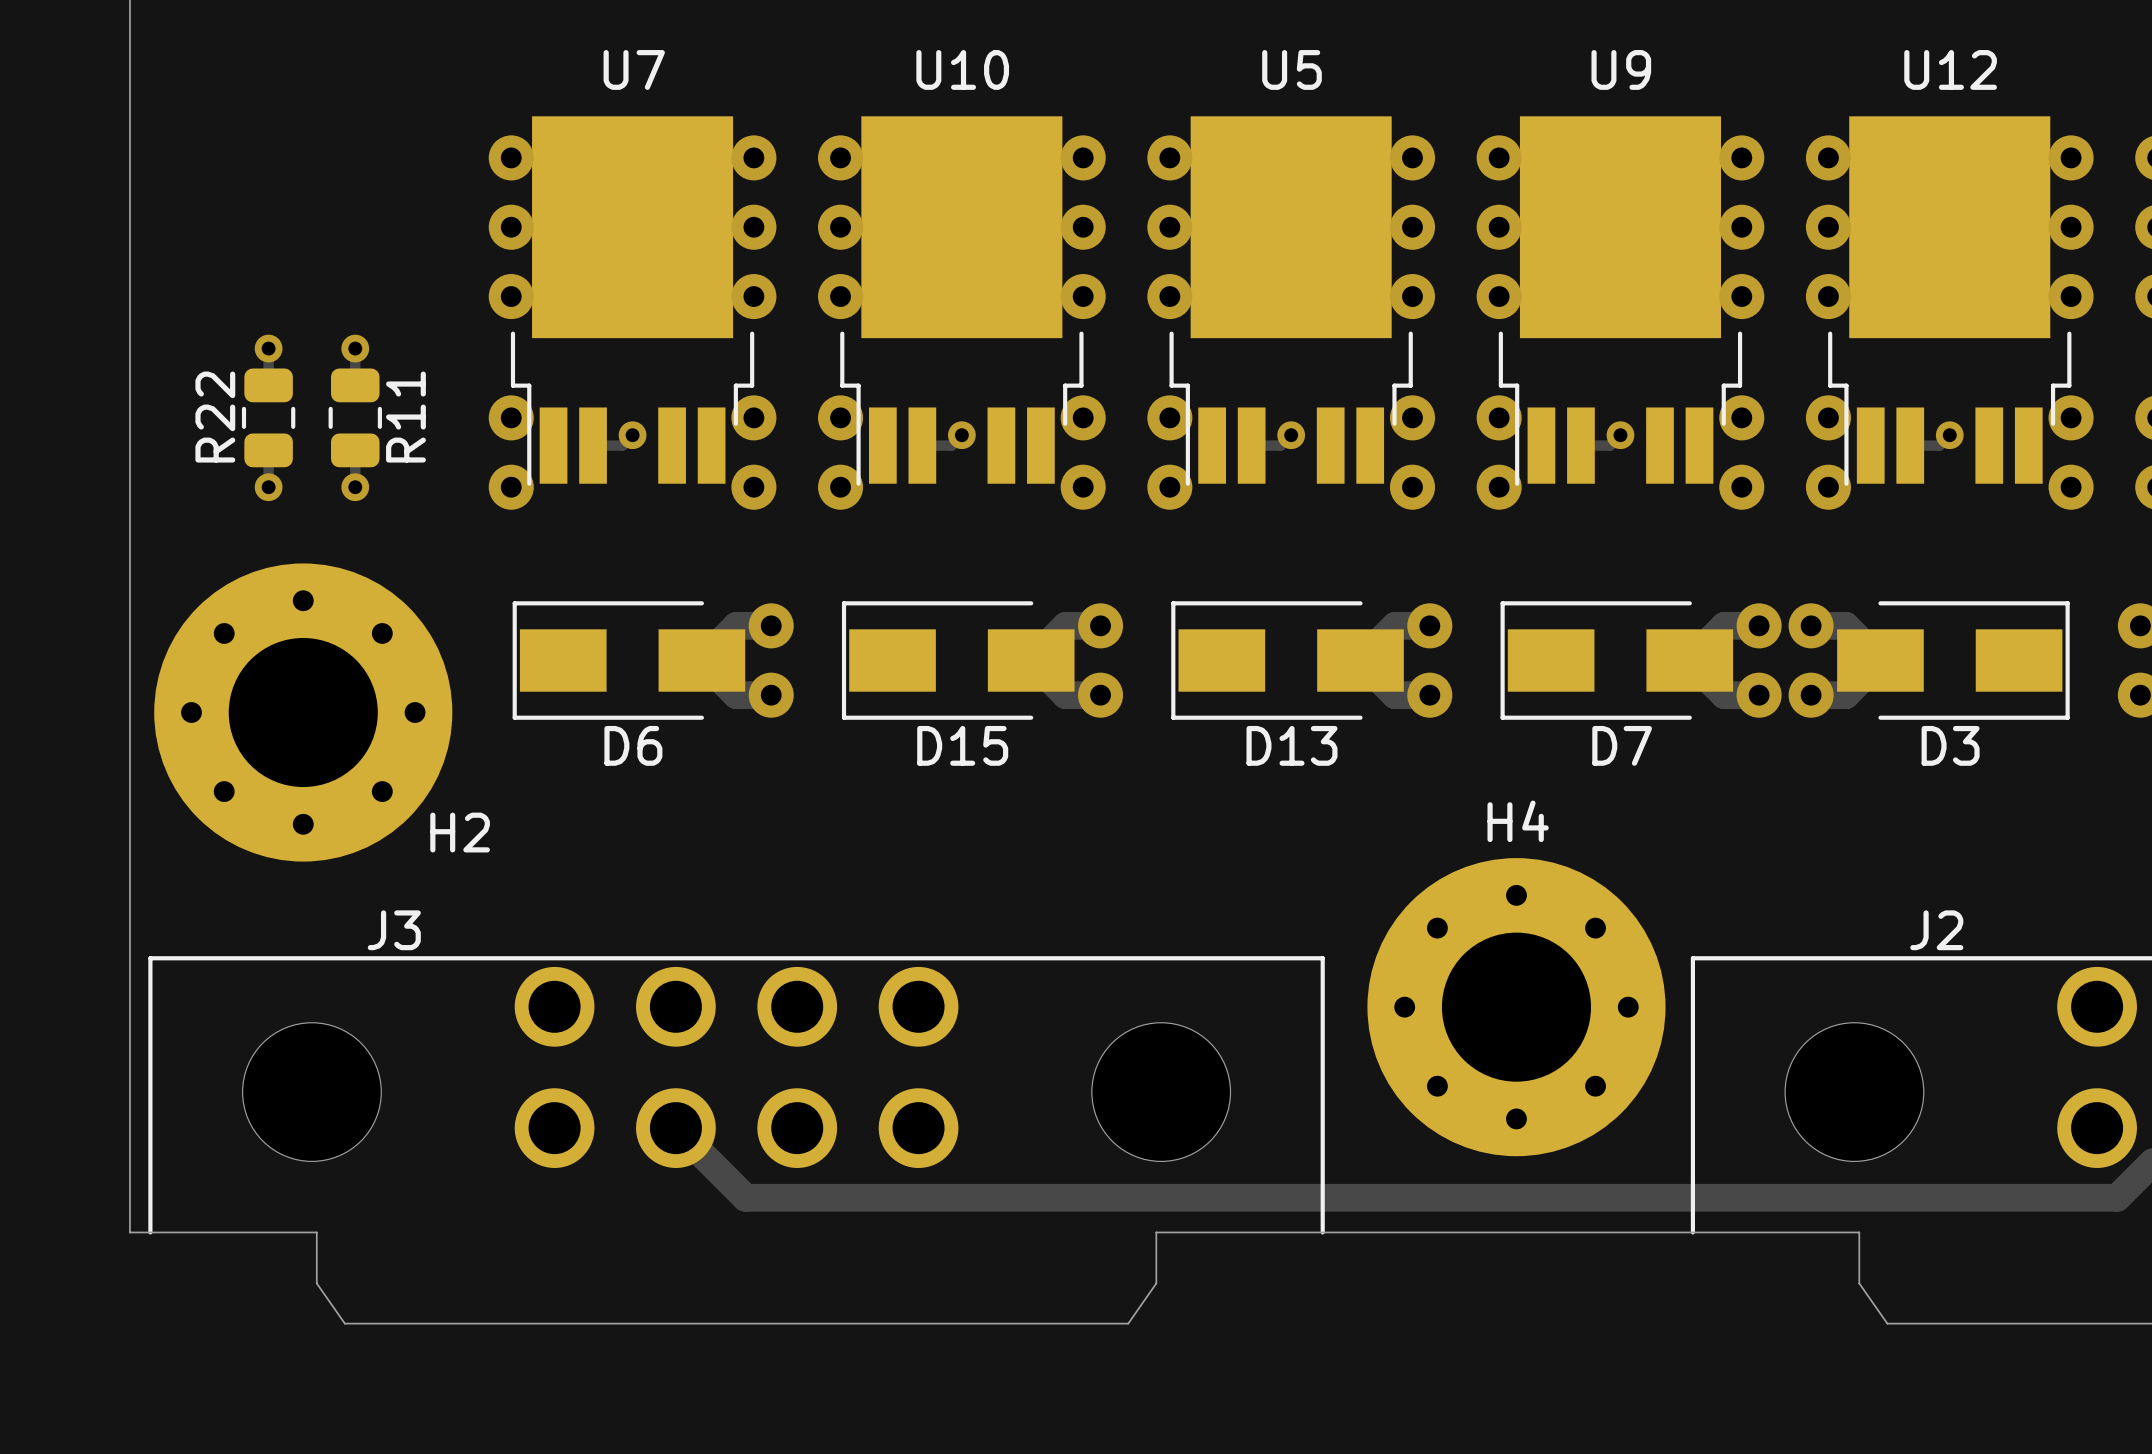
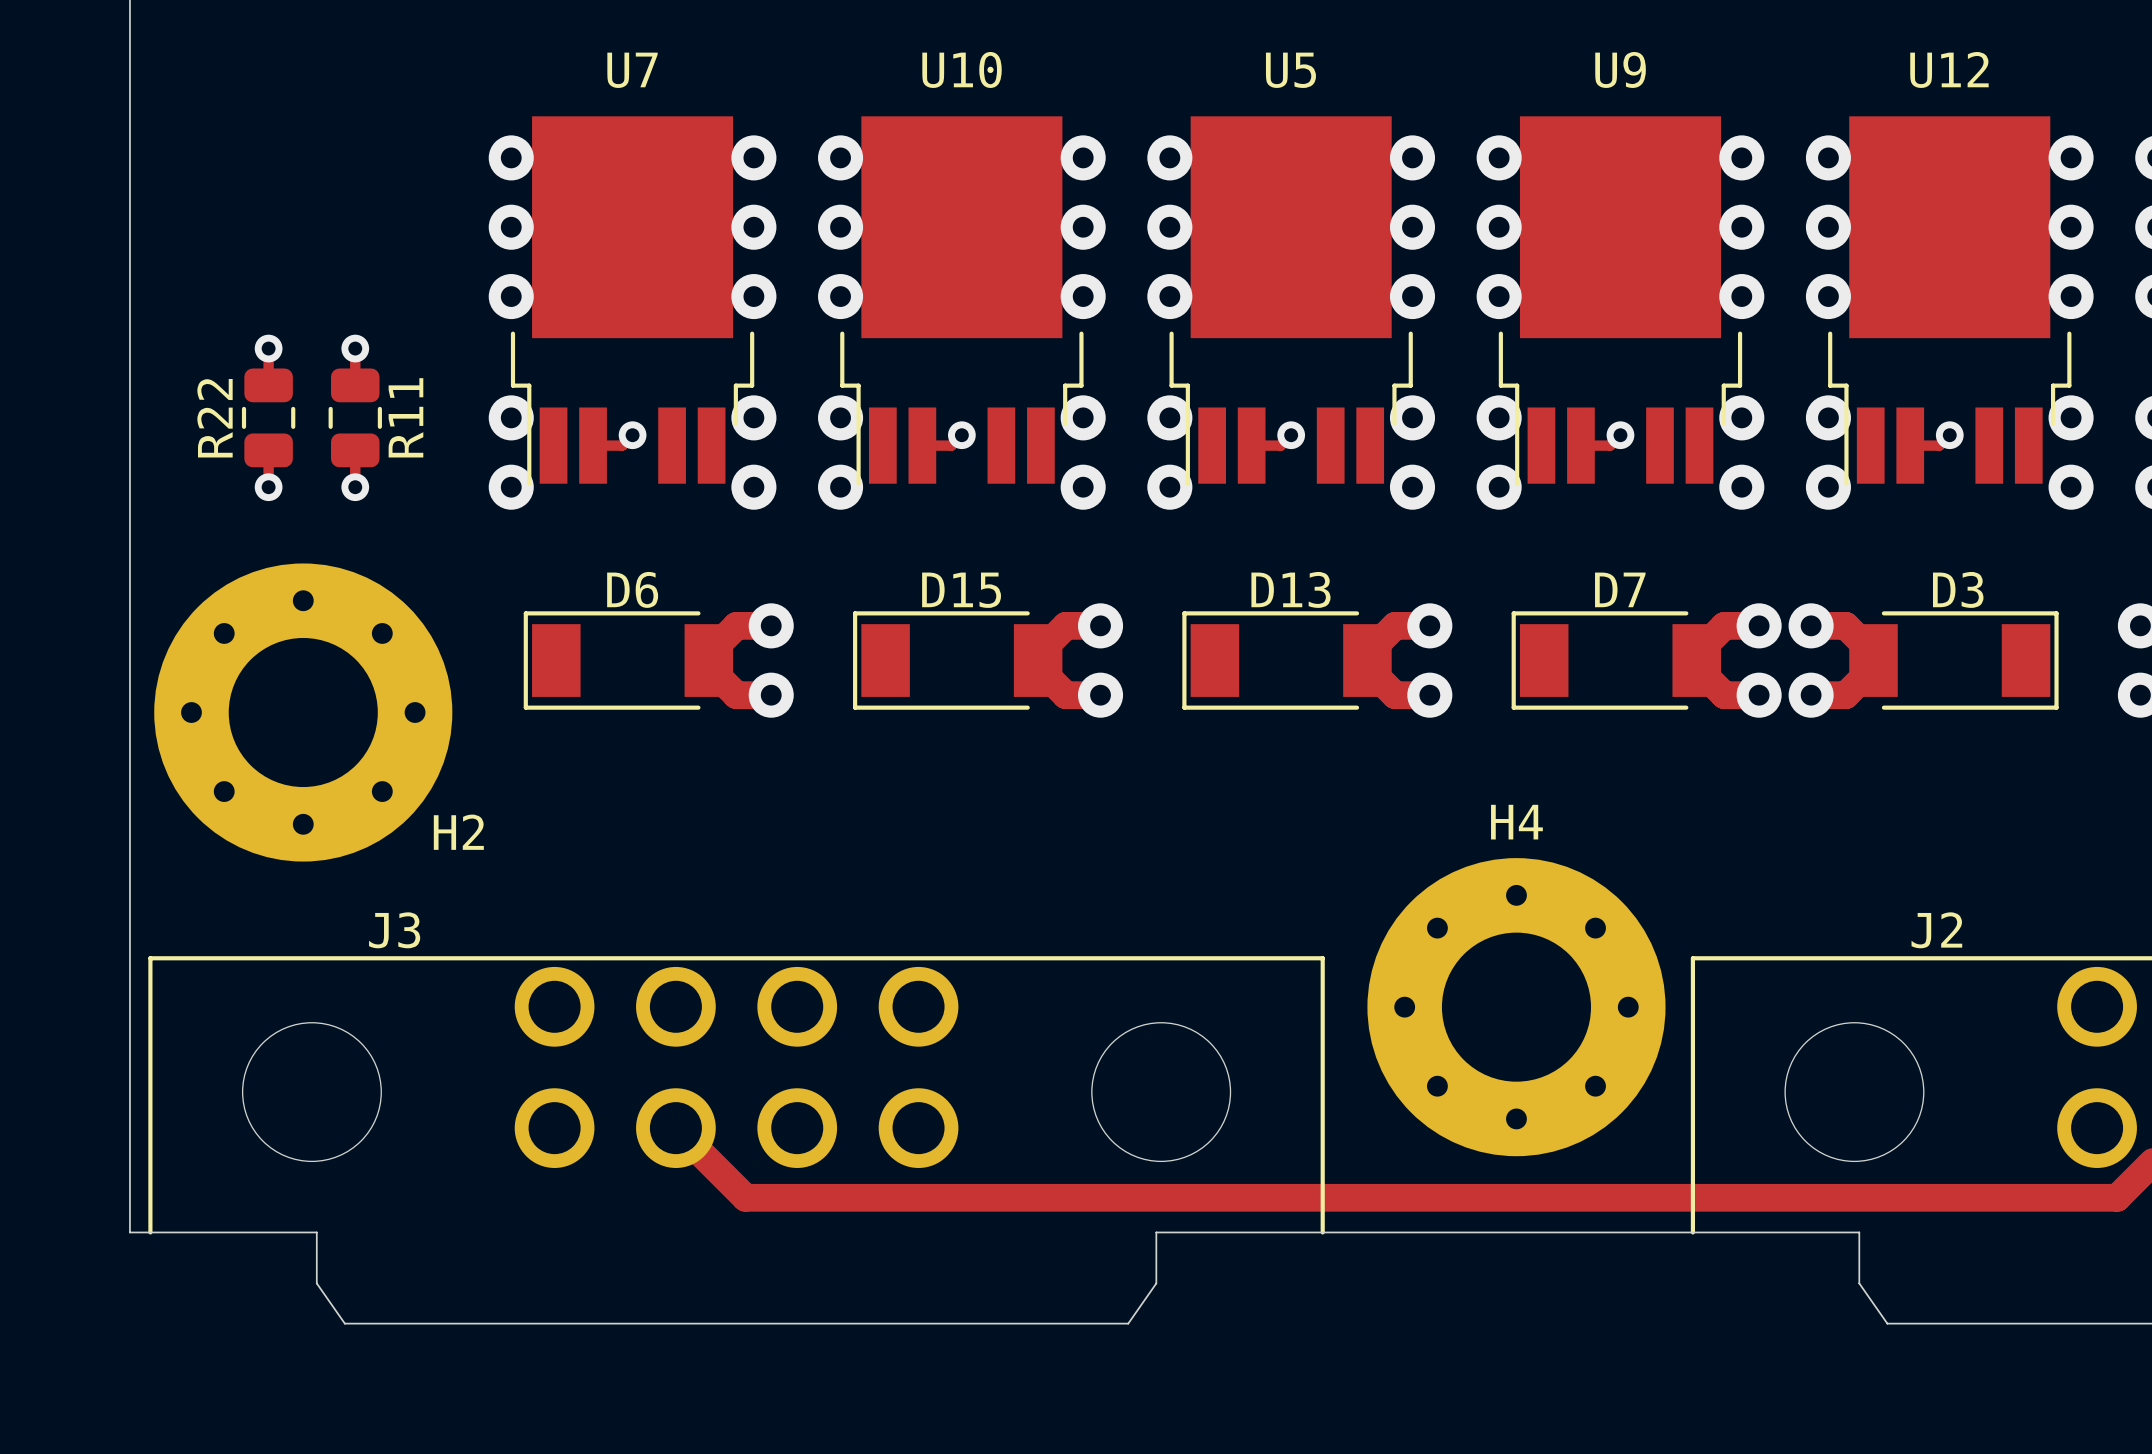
D6 footprint: [512, 601, 746, 720] -> [523, 611, 734, 710]
D15 footprint: [841, 601, 1075, 720] -> [853, 611, 1063, 710]
D13 footprint: [1171, 601, 1404, 720] -> [1182, 611, 1392, 710]
D7 footprint: [1500, 601, 1734, 720] -> [1511, 611, 1721, 710]
D3 footprint: [1837, 601, 2070, 720] -> [1849, 611, 2059, 710]
D6 name position: D6 (633, 745) -> D6 (632, 589)
D15 name position: D15 (962, 745) -> D15 (961, 590)
D13 name position: D13 (1291, 745) -> D13 (1290, 589)
D7 name position: D7 (1622, 745) -> D7 (1620, 589)
D3 name position: D3 (1950, 745) -> D3 (1958, 589)

